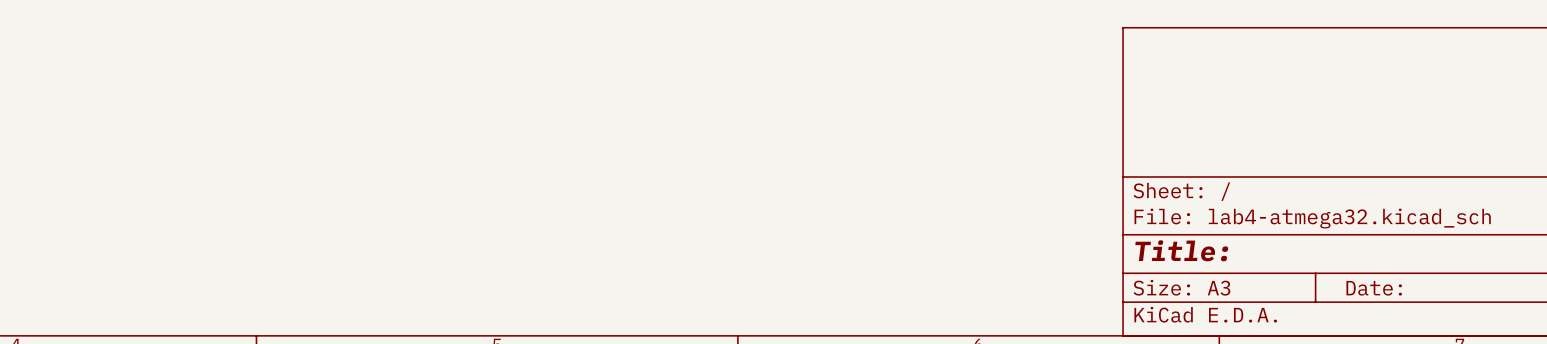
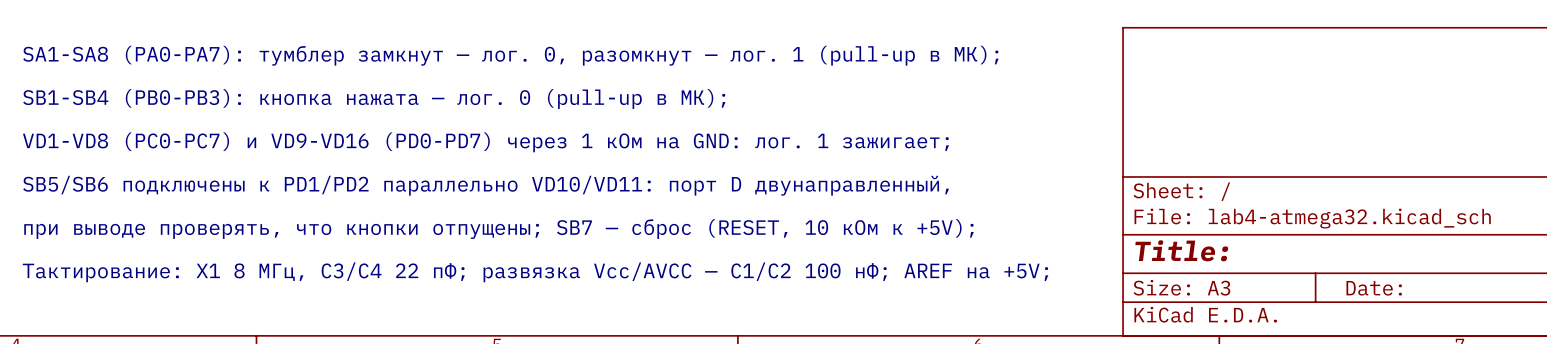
text: none -> SA1-SA8 (PA0-PA7): тумблер замкнут — лог. 0, разомкнут — лог. 1 (pull-up в МК); (510, 55)
text: none -> SB1-SB4 (PB0-PB3): кнопка нажата — лог. 0 (pull-up в МК); (374, 99)
text: none -> VD1-VD8 (PC0-PC7) и VD9-VD16 (PD0-PD7) через 1 кОм на GND: лог. 1 зажигает; (485, 142)
text: none -> SB5/SB6 подключены к PD1/PD2 параллельно VD10/VD11: порт D двунаправленный, (486, 185)
text: none -> при выводе проверять, что кнопки отпущены; SB7 — сброс (RESET, 10 кОм к +5V); (499, 229)
text: none -> Тактирование: X1 8 МГц, C3/C4 22 пФ; развязка Vcc/AVCC — C1/C2 100 нФ; AREF на +5V; (535, 272)

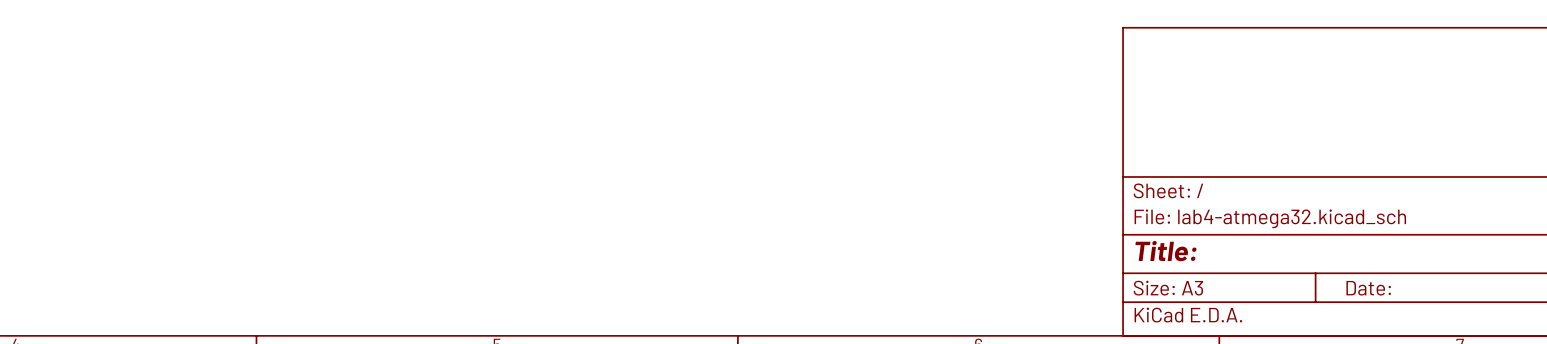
text: SA1-SA8 (PA0-PA7): тумблер замкнут — лог. 0, разомкнут — лог. 1 (pull-up в МК); (510, 55) -> none
text: SB1-SB4 (PB0-PB3): кнопка нажата — лог. 0 (pull-up в МК); (374, 99) -> none
text: VD1-VD8 (PC0-PC7) и VD9-VD16 (PD0-PD7) через 1 кОм на GND: лог. 1 зажигает; (485, 142) -> none
text: SB5/SB6 подключены к PD1/PD2 параллельно VD10/VD11: порт D двунаправленный, (486, 185) -> none
text: при выводе проверять, что кнопки отпущены; SB7 — сброс (RESET, 10 кОм к +5V); (499, 229) -> none
text: Тактирование: X1 8 МГц, C3/C4 22 пФ; развязка Vcc/AVCC — C1/C2 100 нФ; AREF на +5V; (535, 272) -> none

